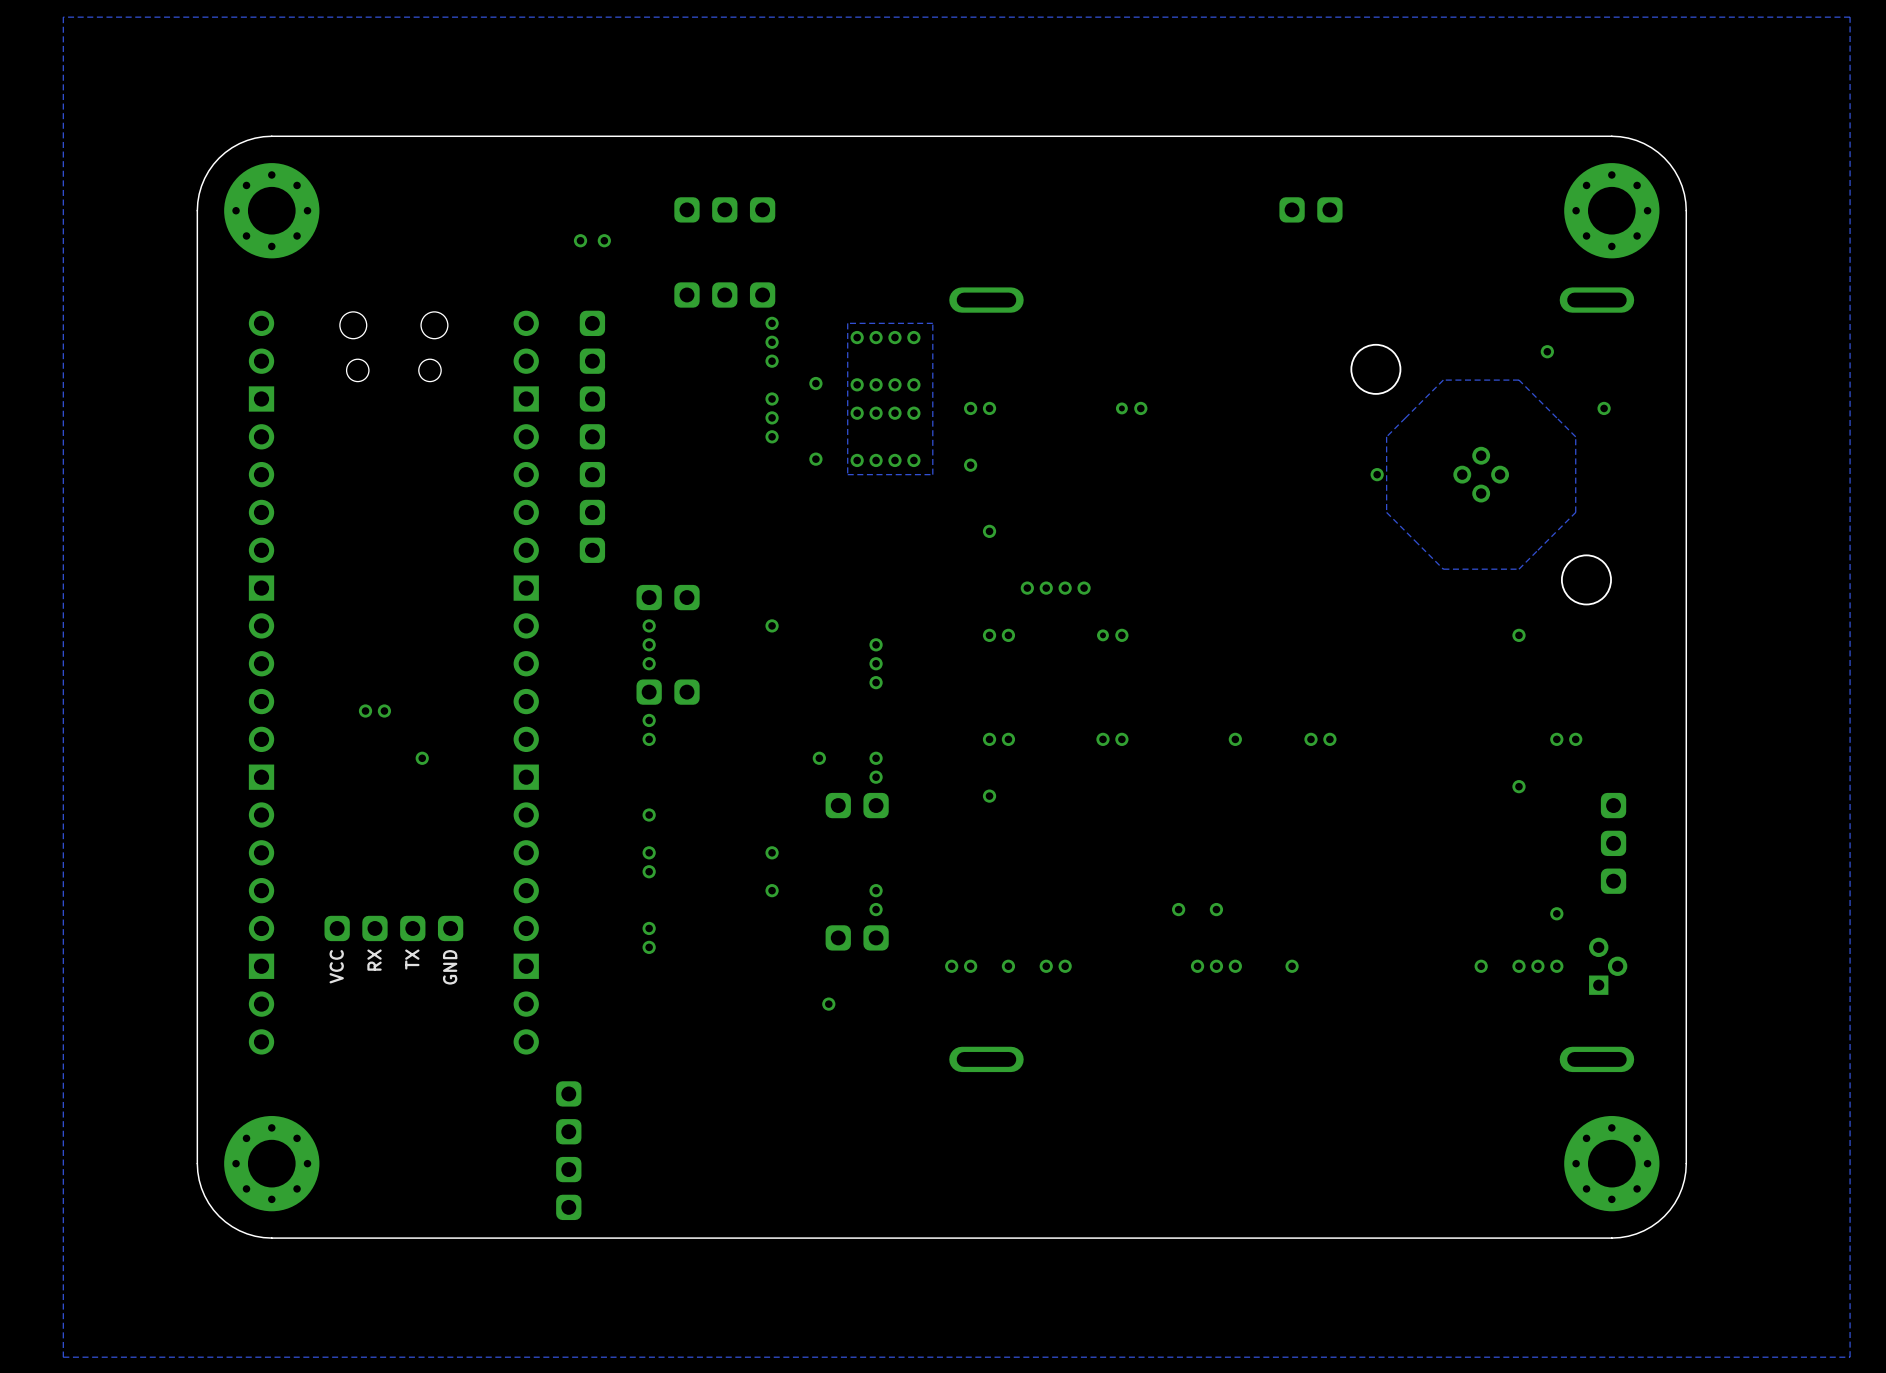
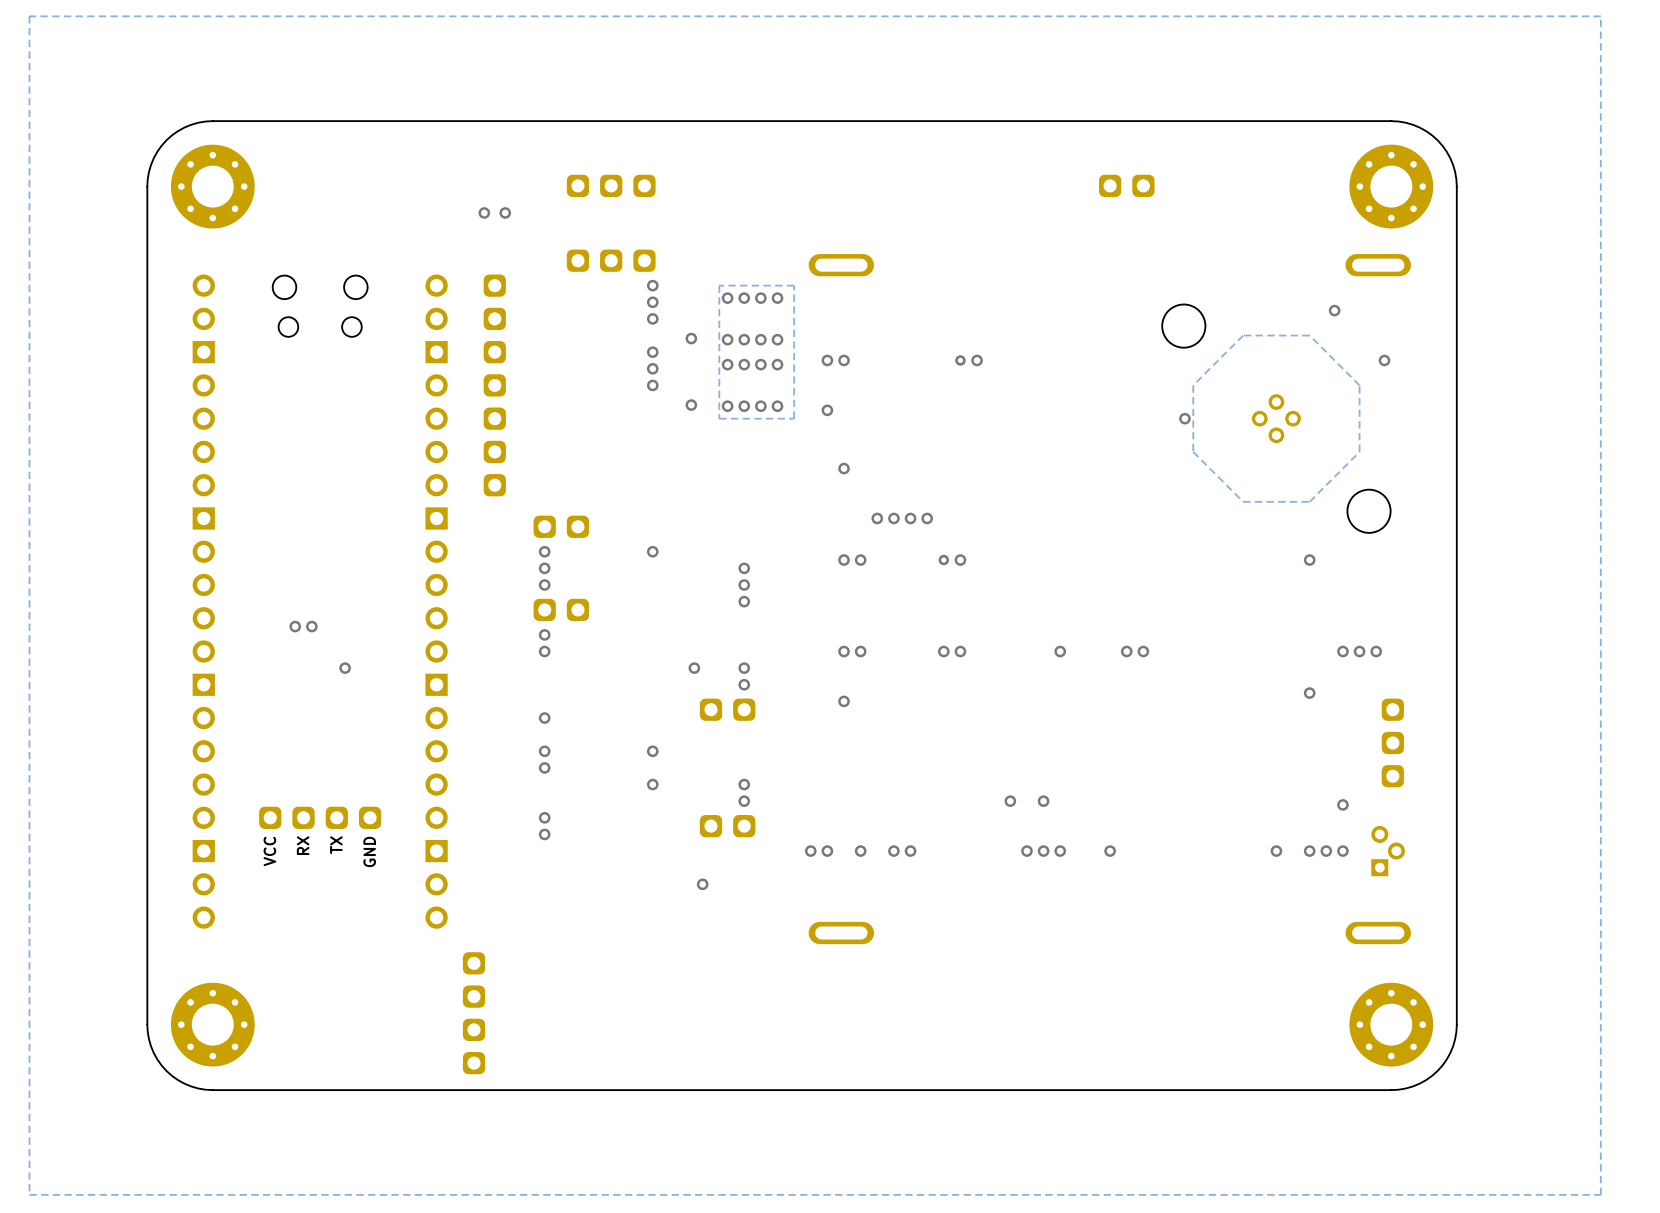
via: none -> (1376, 651)

